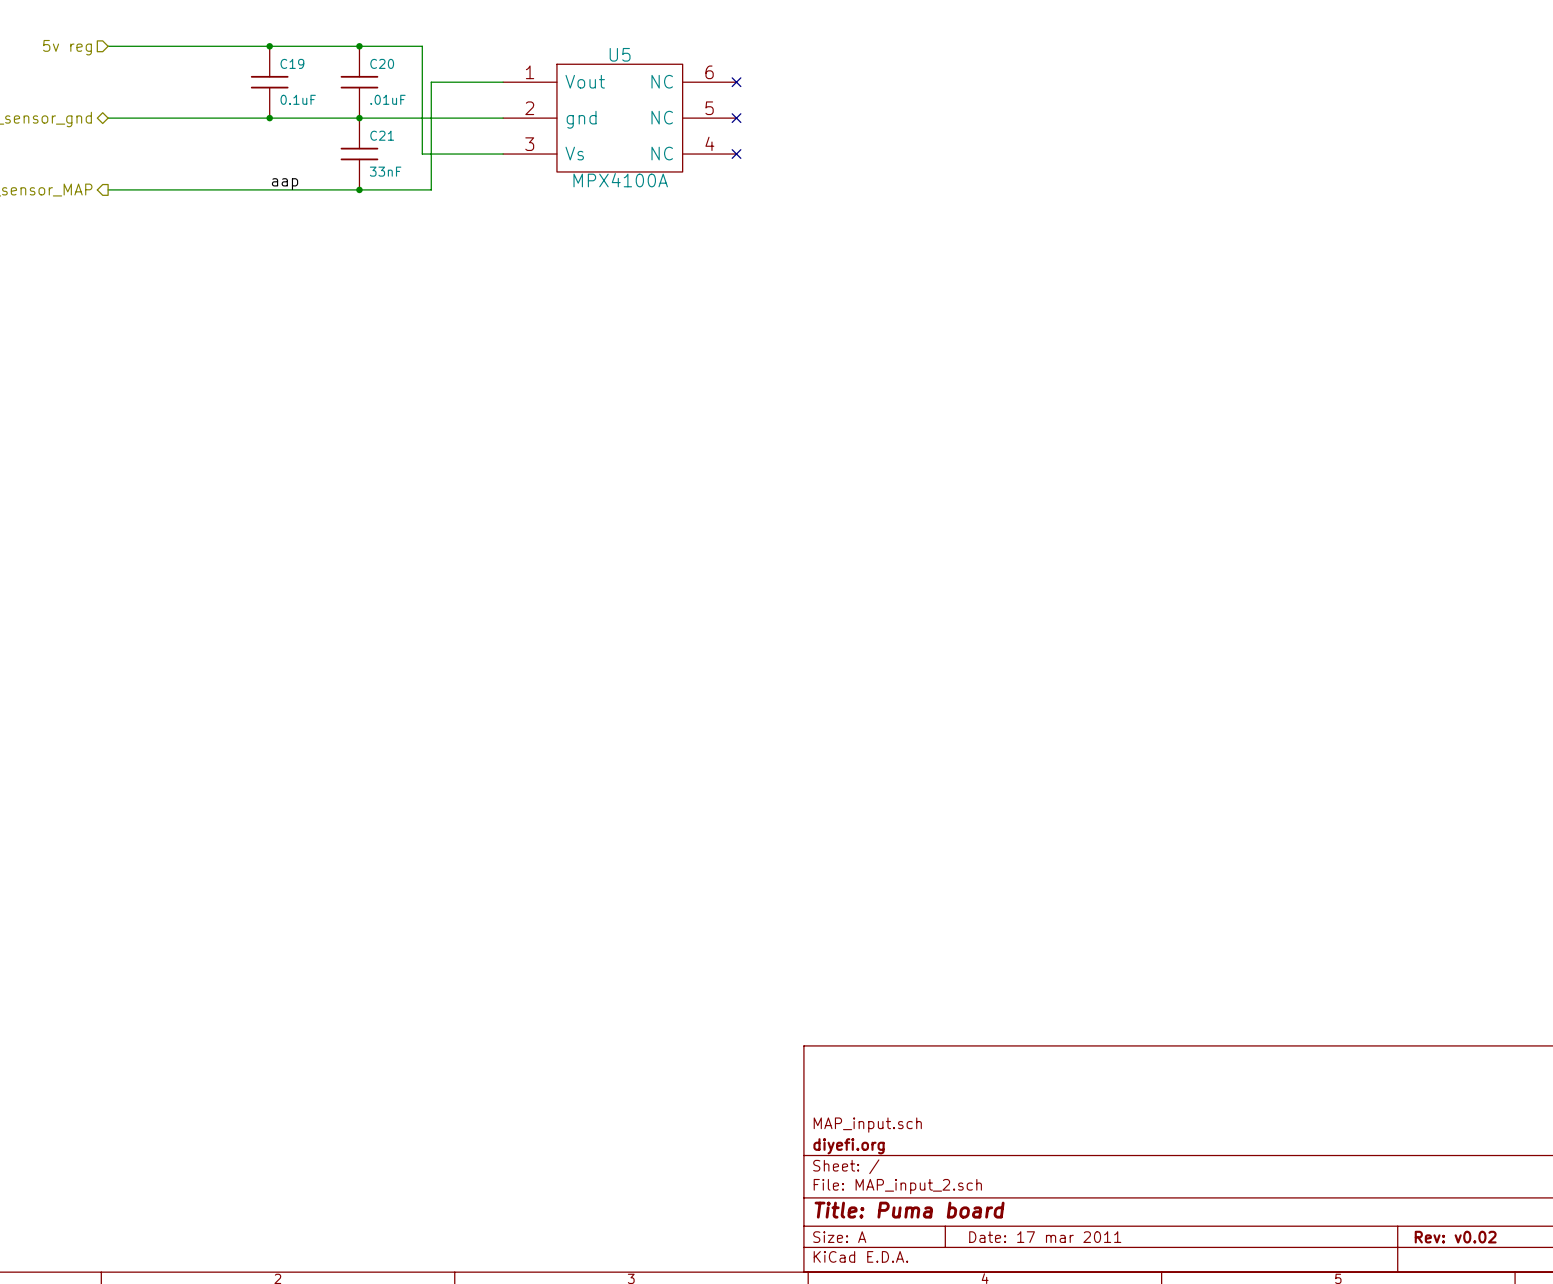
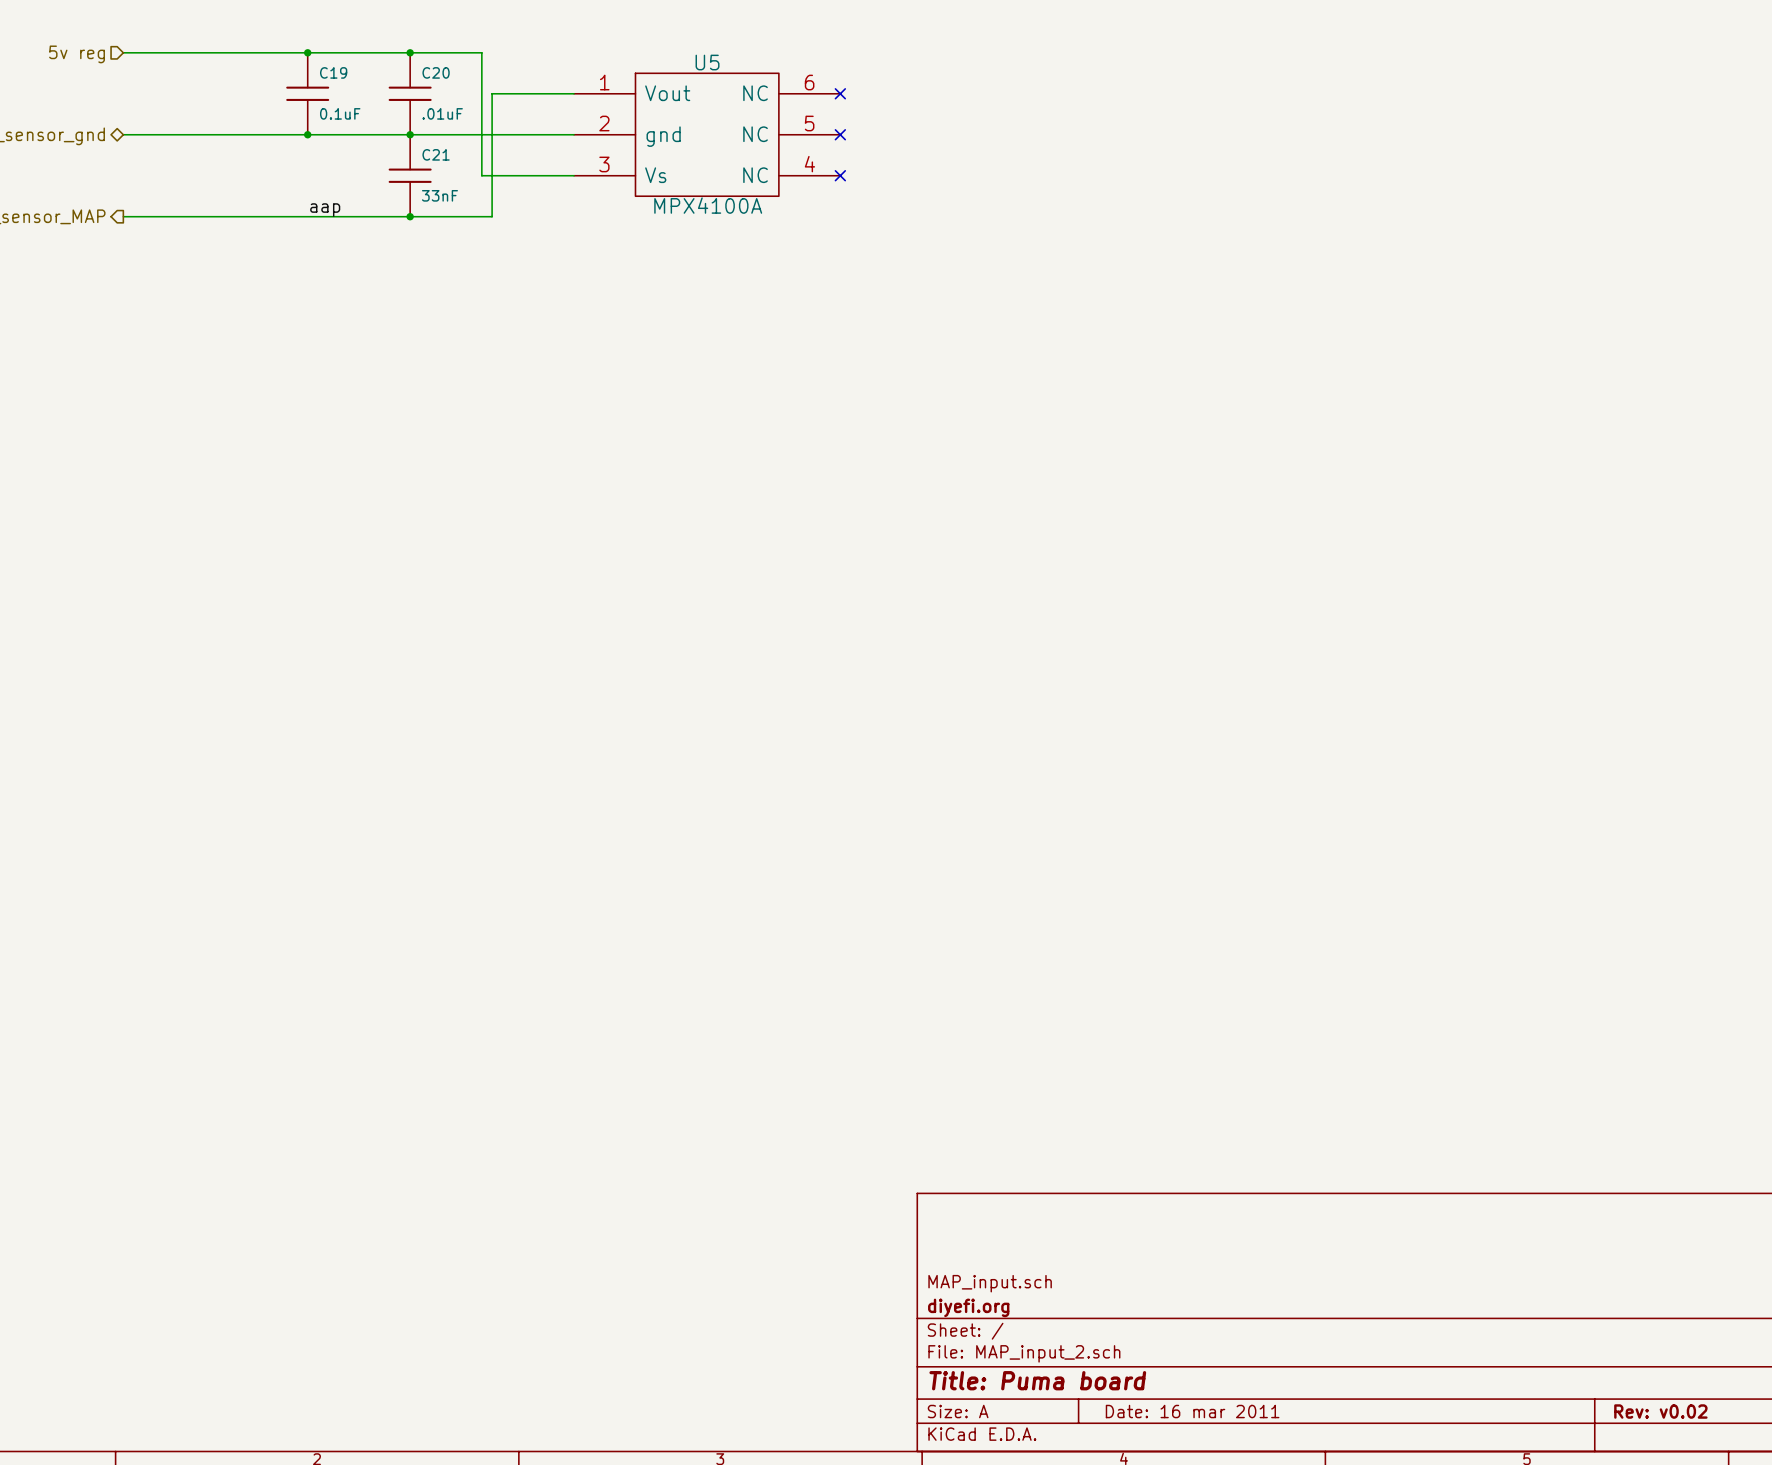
title block: Date: 17 mar 2011 (1045, 1237) -> Date: 16 mar 2011 (1192, 1411)

